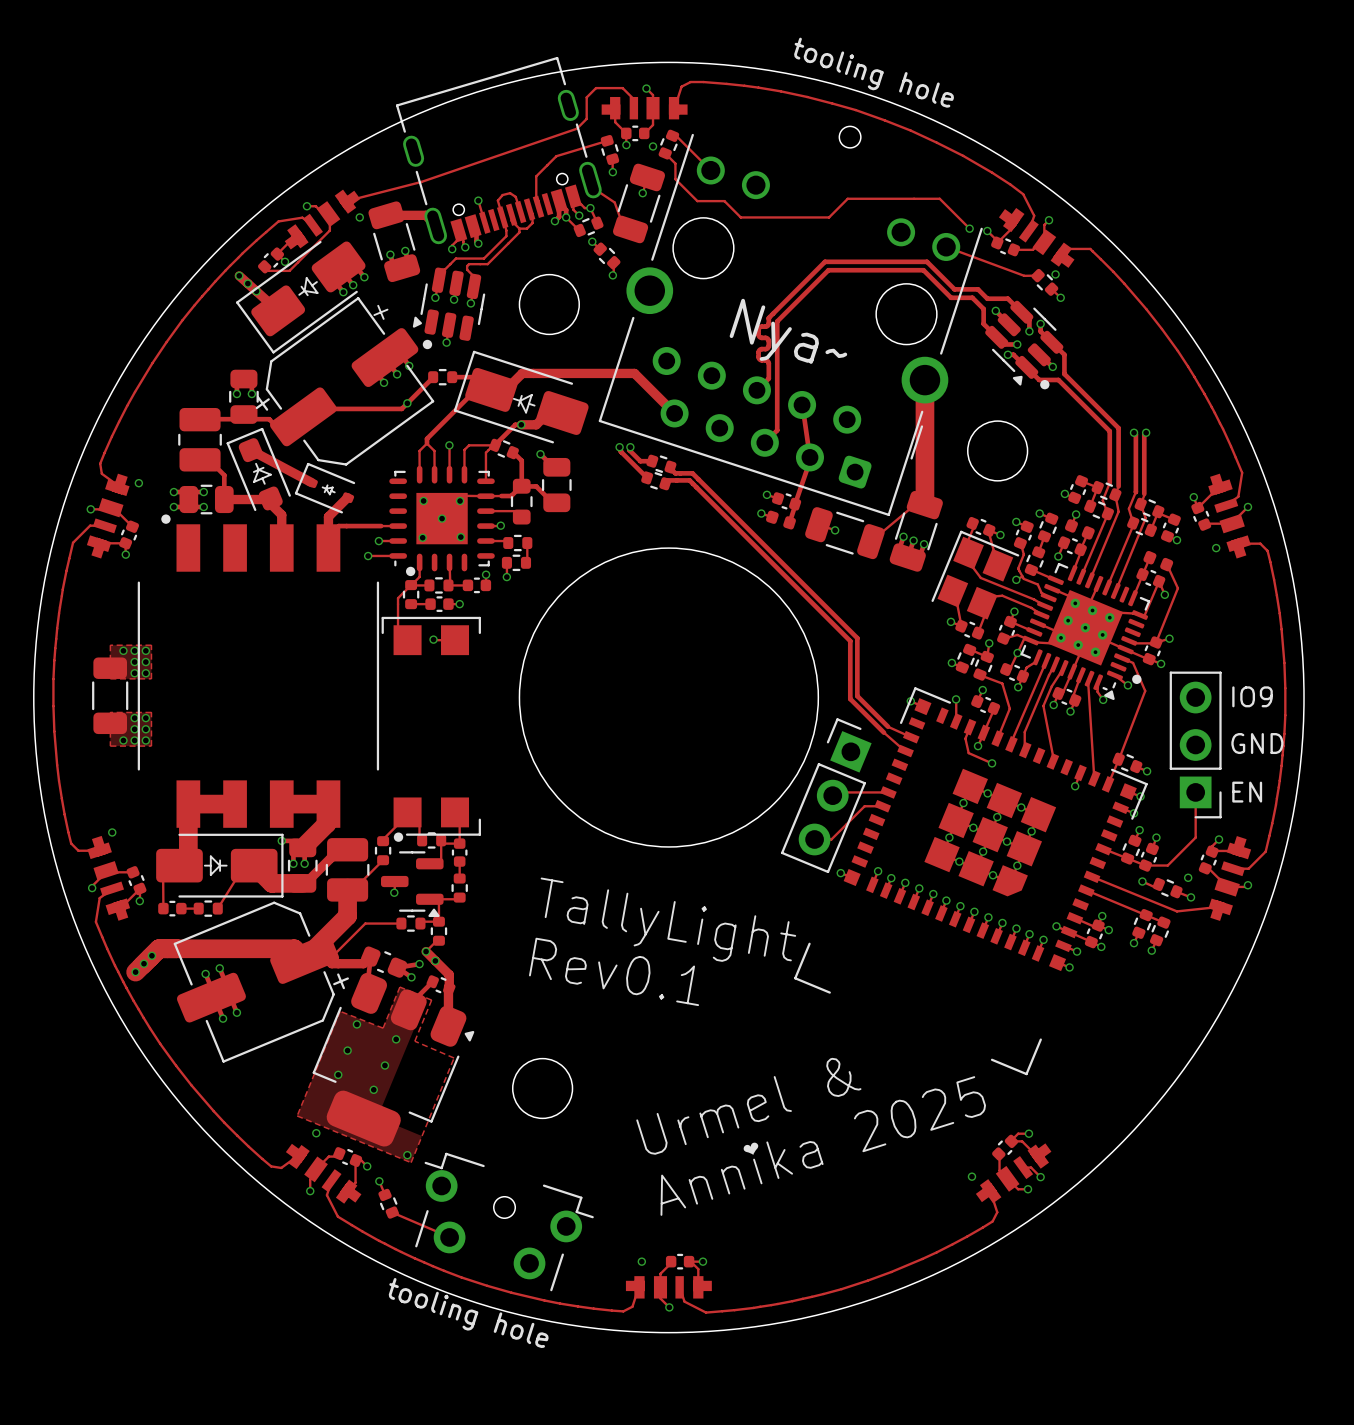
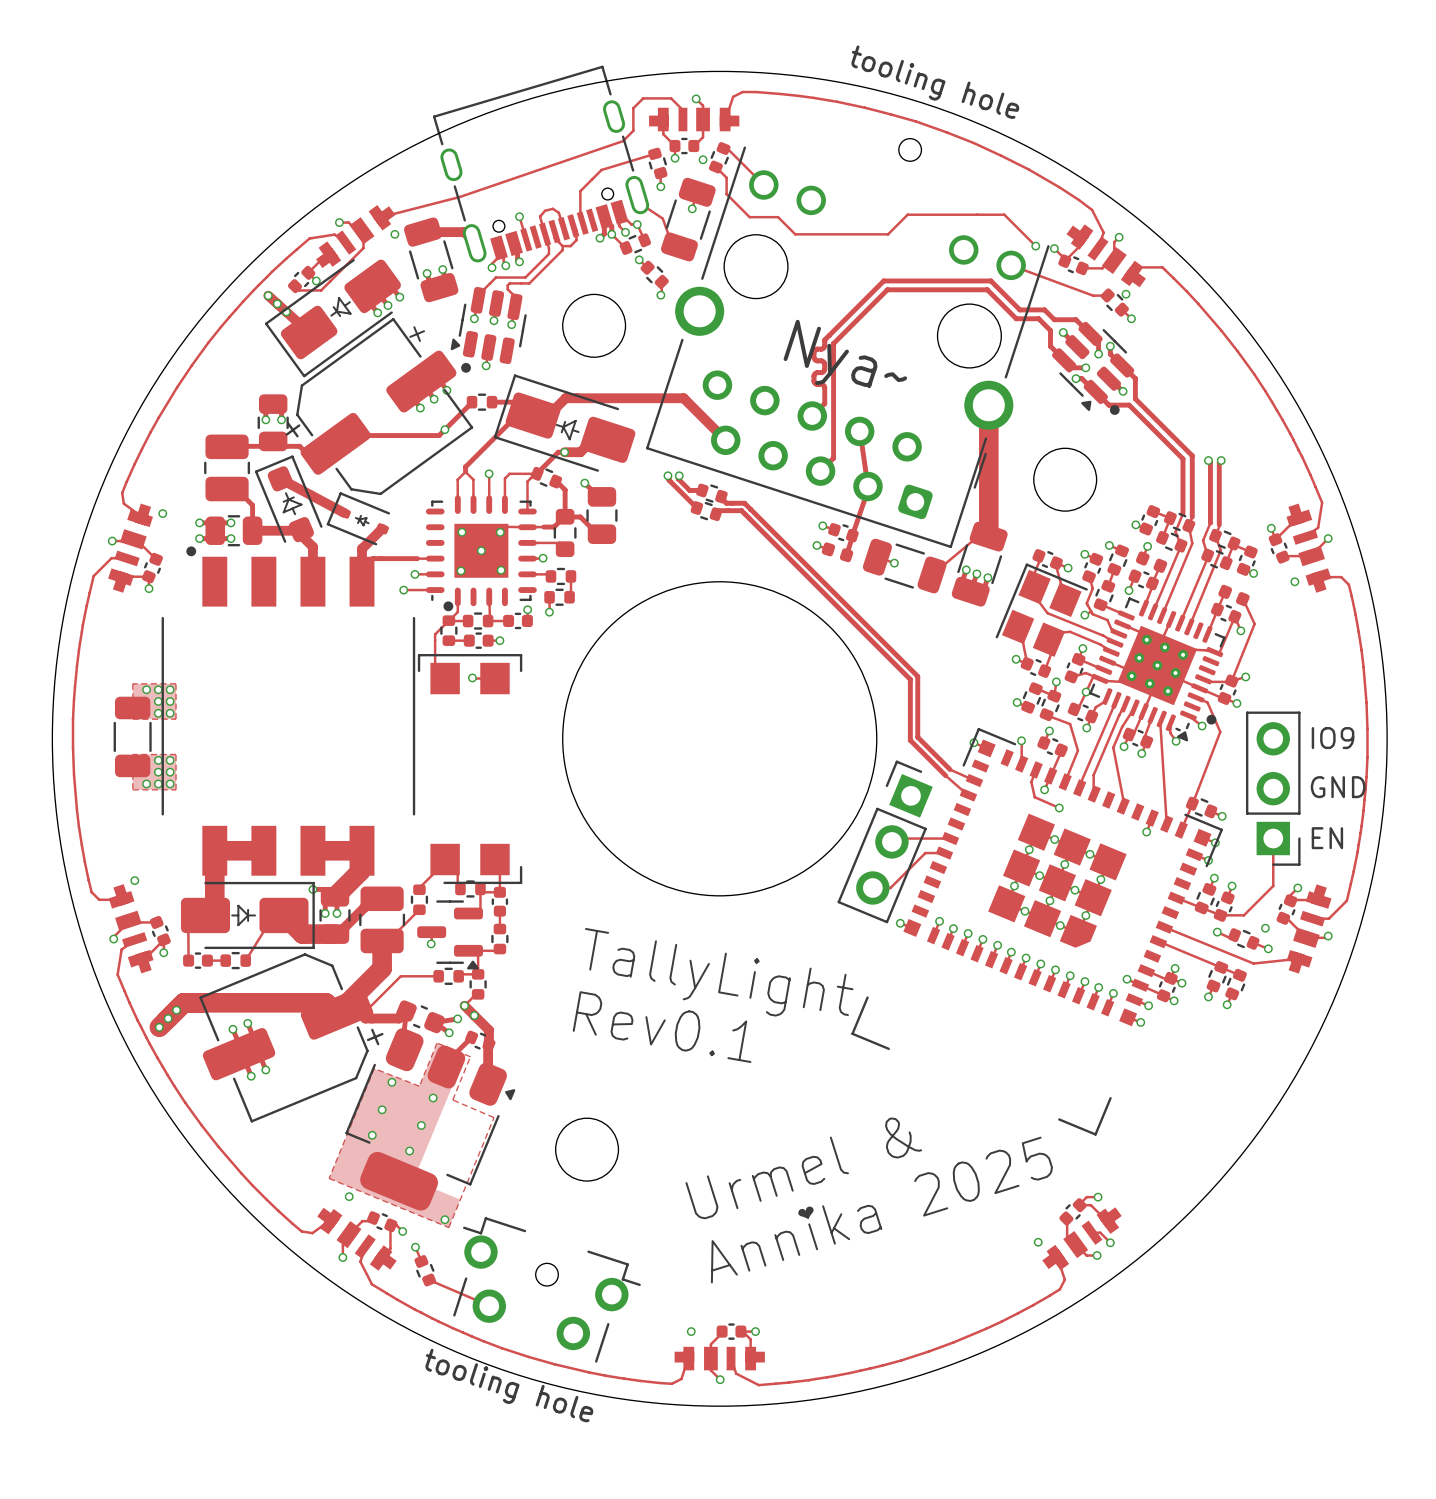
drawing: [393, 832, 404, 842] -> none

